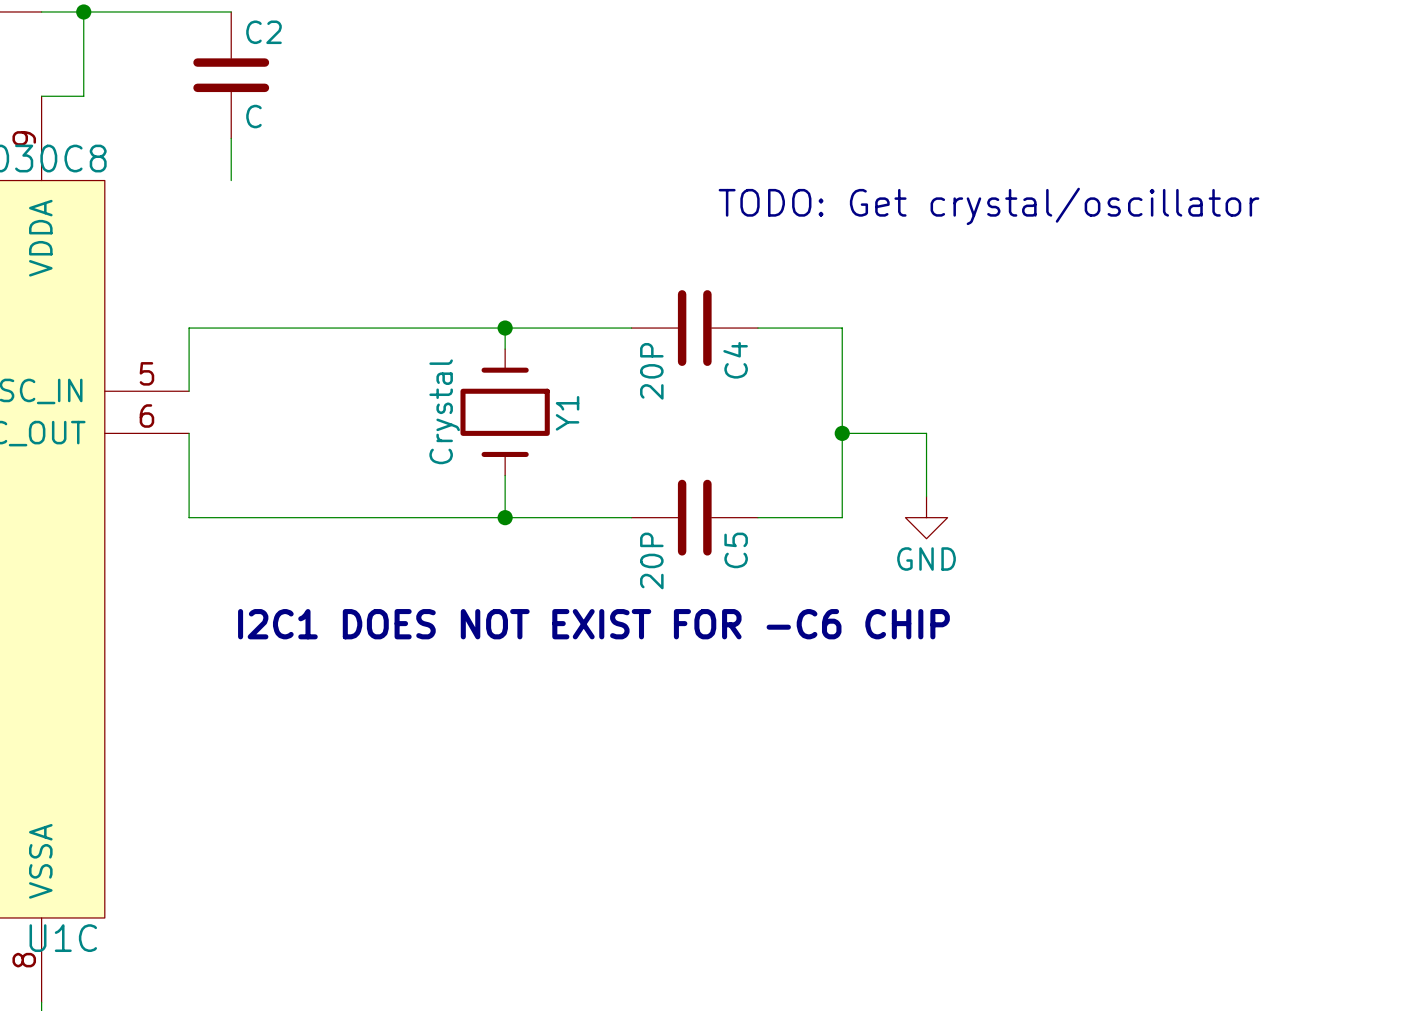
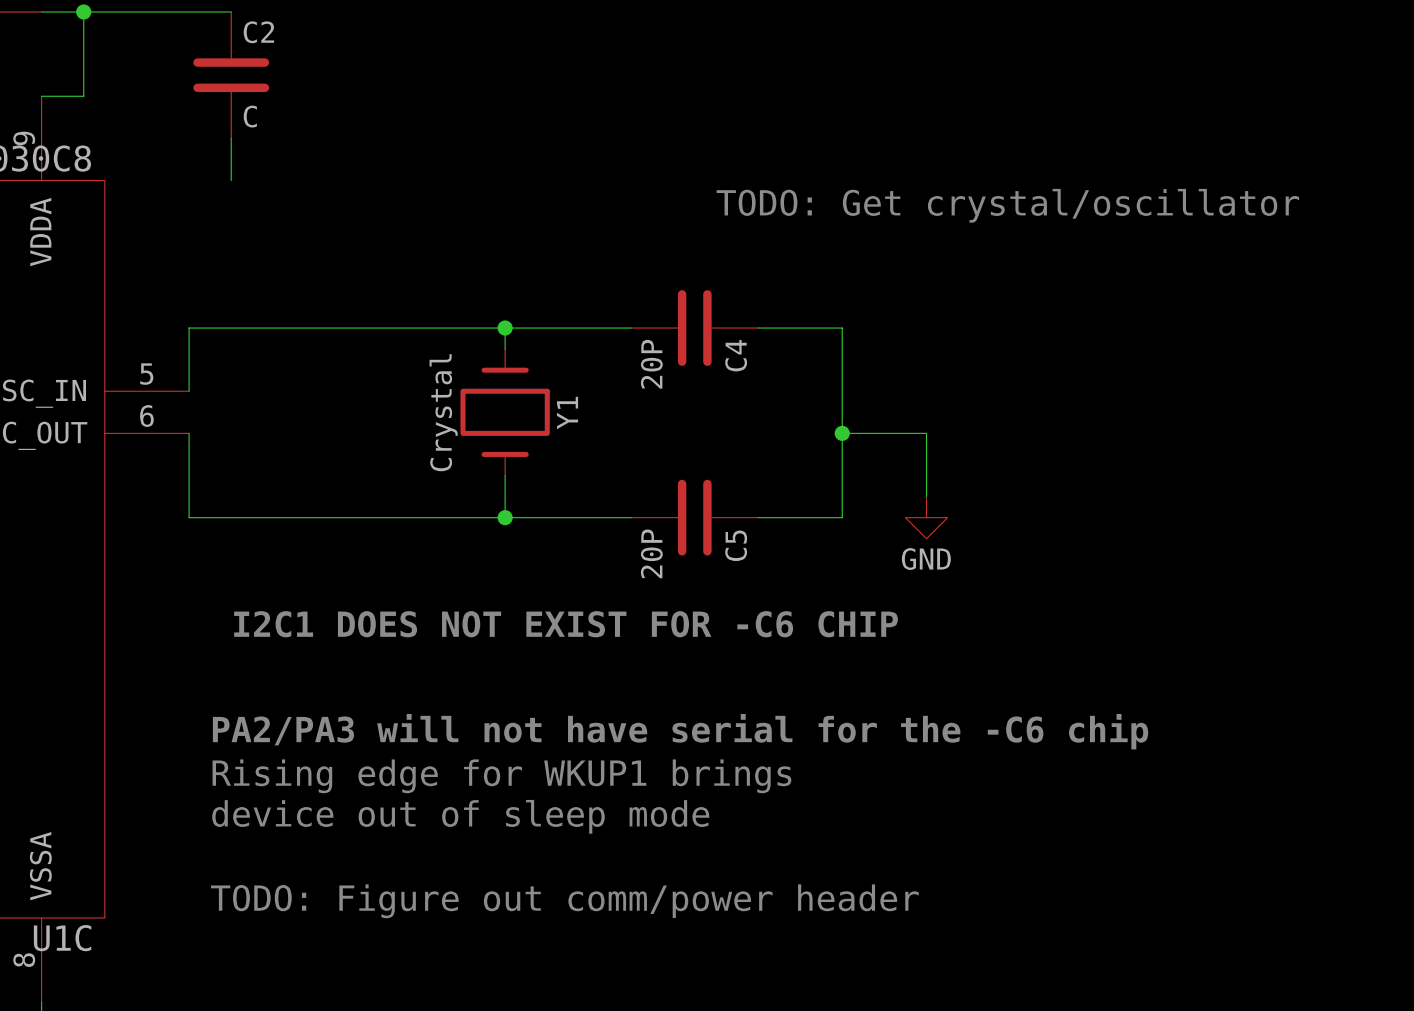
text: none -> PA2/PA3 will not have serial for the -C6 chip (680, 731)
text: none -> Rising edge for WKUP1 brings (501, 776)
text: none -> device out of sleep mode (460, 816)
text: none -> TODO: Figure out comm/power header (564, 901)

